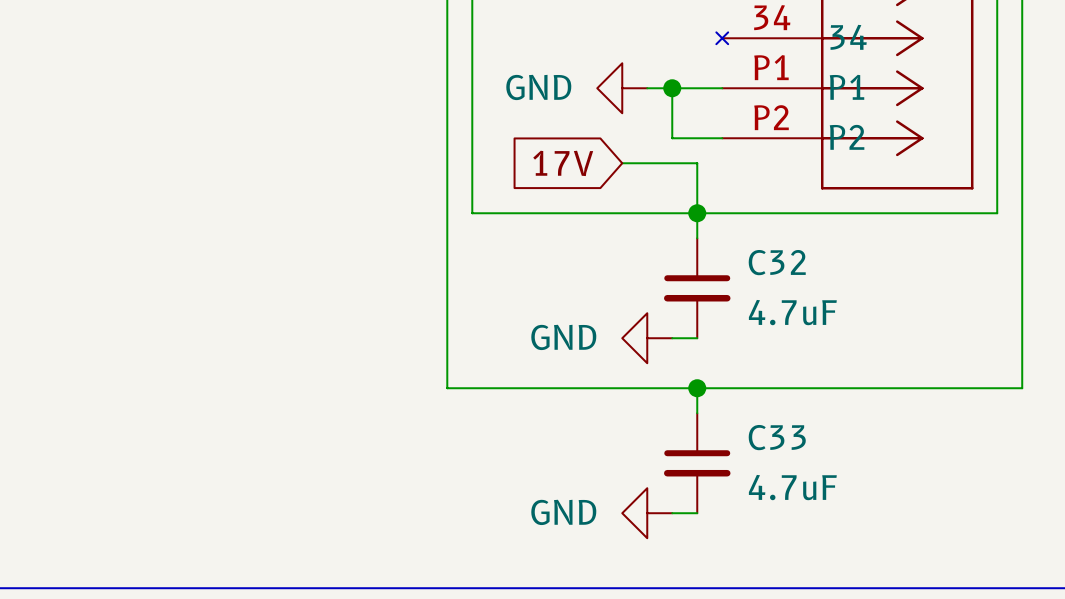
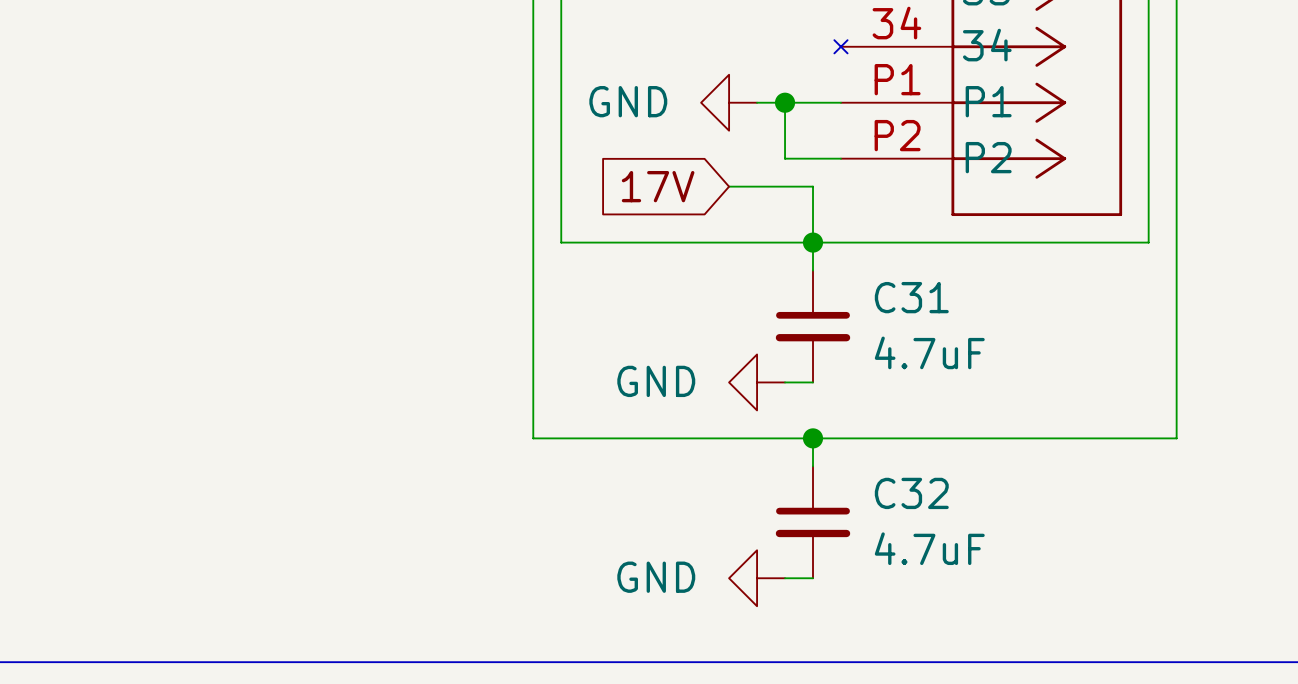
C32 name: C32 (777, 262) -> C31 (911, 297)
C33 name: C33 (777, 437) -> C32 (911, 493)

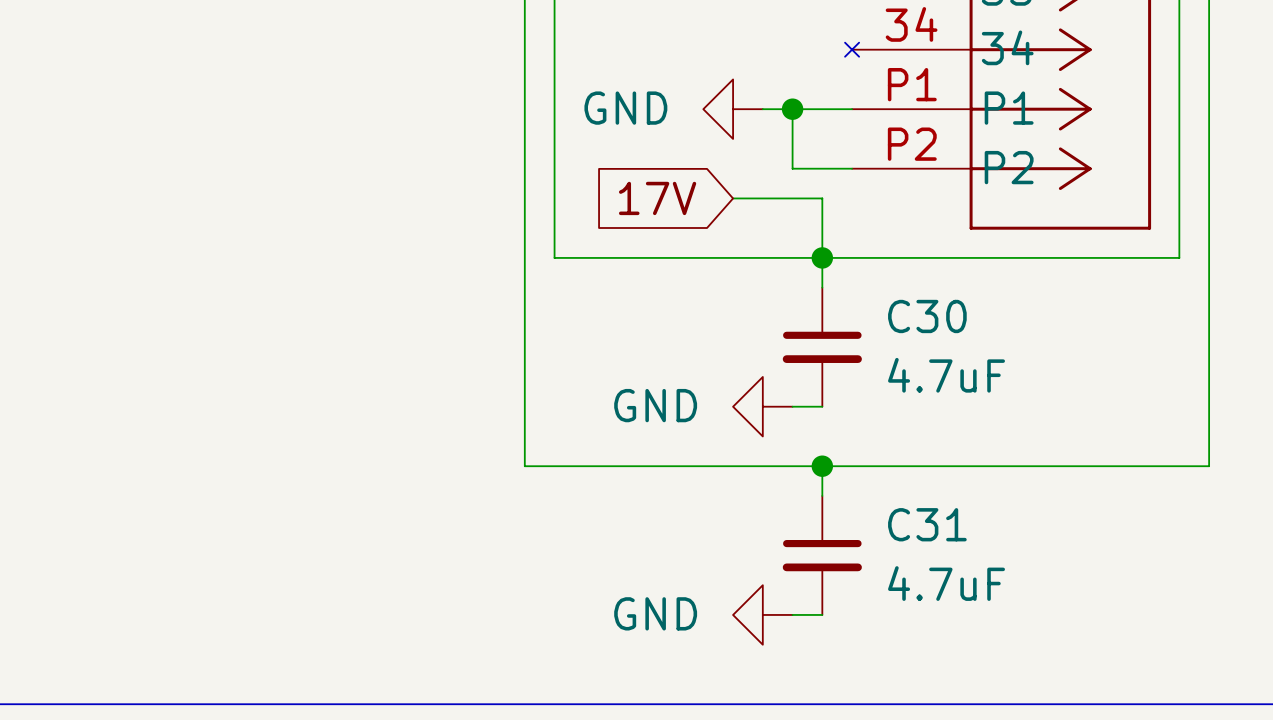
C31 name: C31 (911, 297) -> C30 (927, 316)
C32 name: C32 (911, 493) -> C31 (927, 524)

